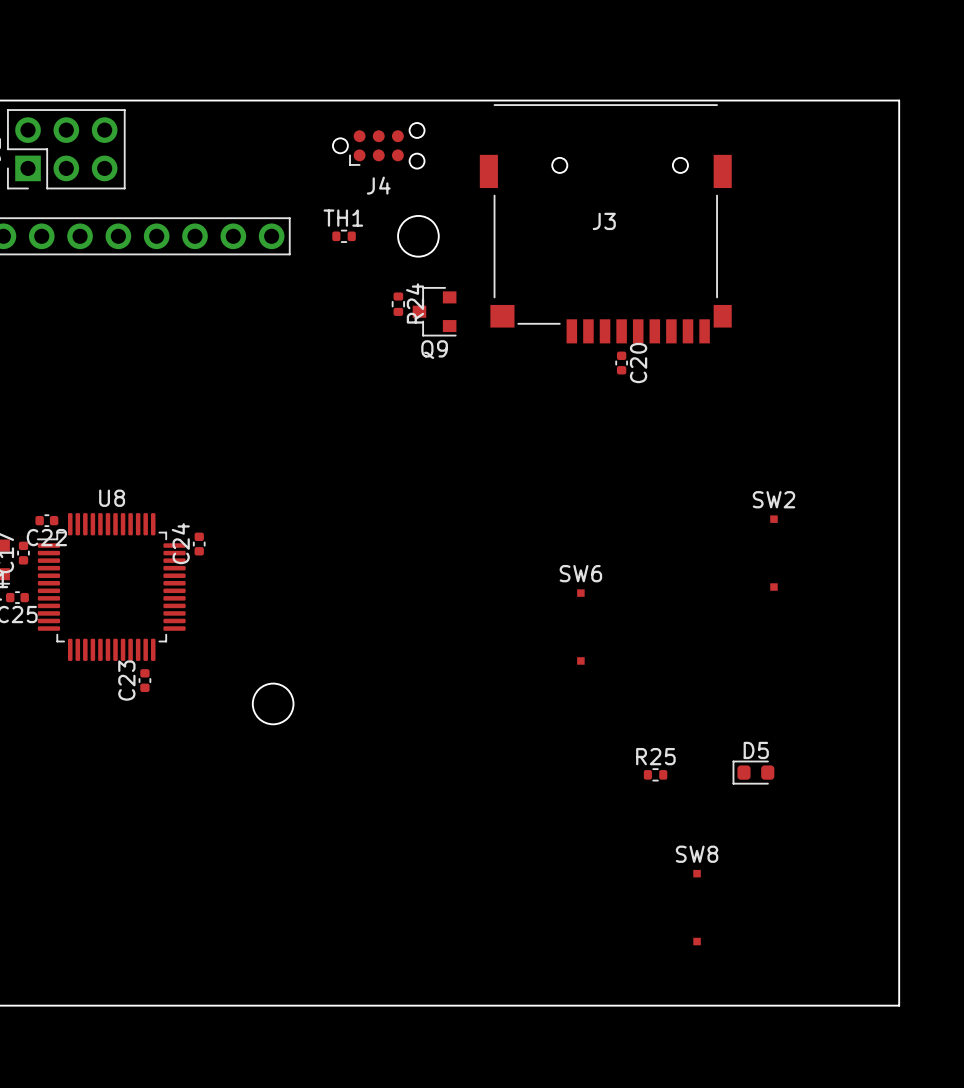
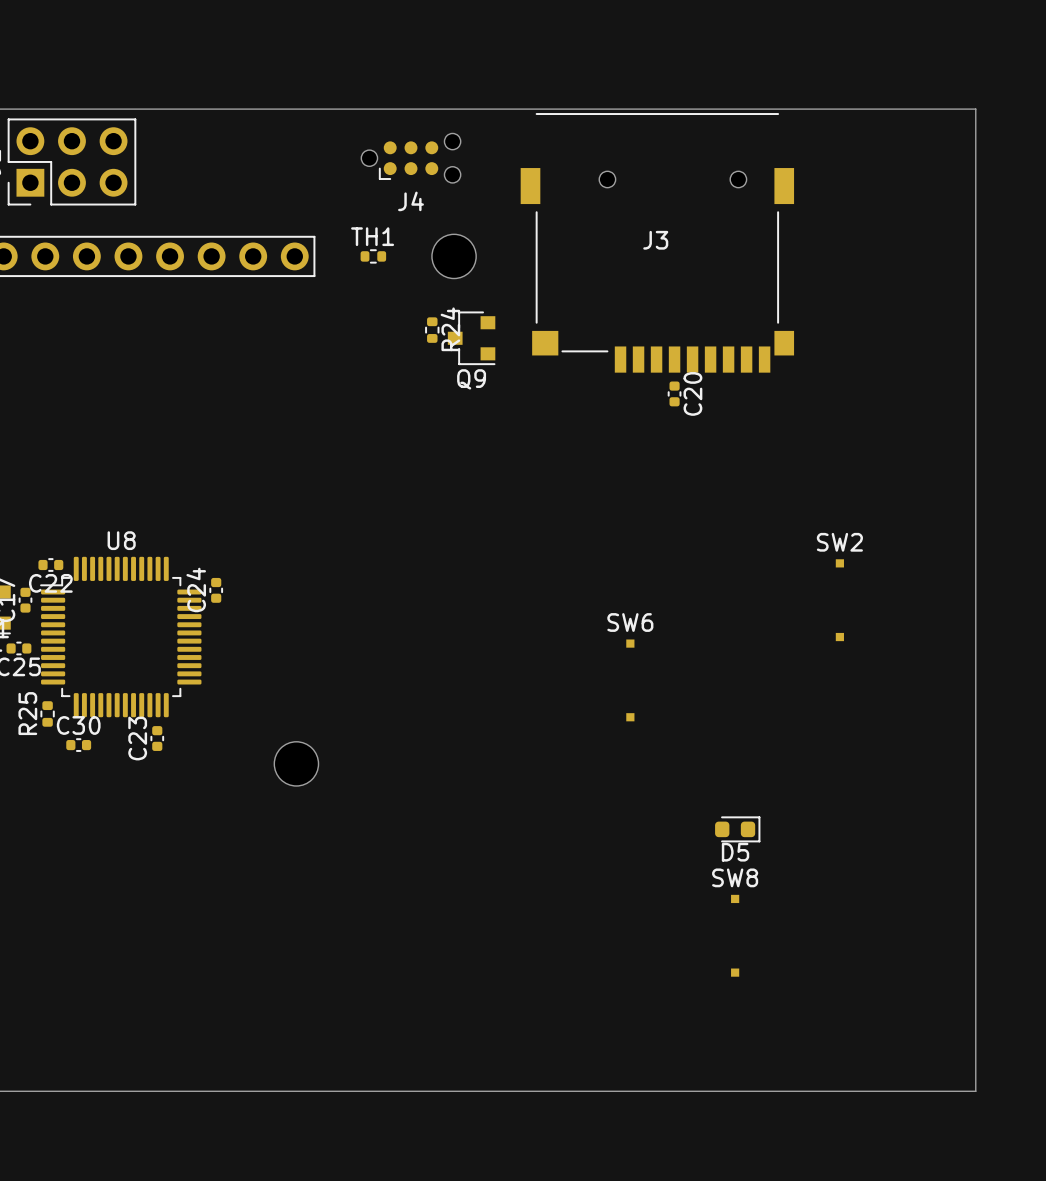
C30: none -> (78, 745)
D5 rotation: 0° (753, 772) -> 180° (737, 829)
D5 position: (753, 772) -> (737, 829)
R25 rotation: 0° (655, 774) -> 90° clockwise (47, 713)
R25 position: (655, 774) -> (47, 713)
SW8 position: (697, 907) -> (735, 935)

